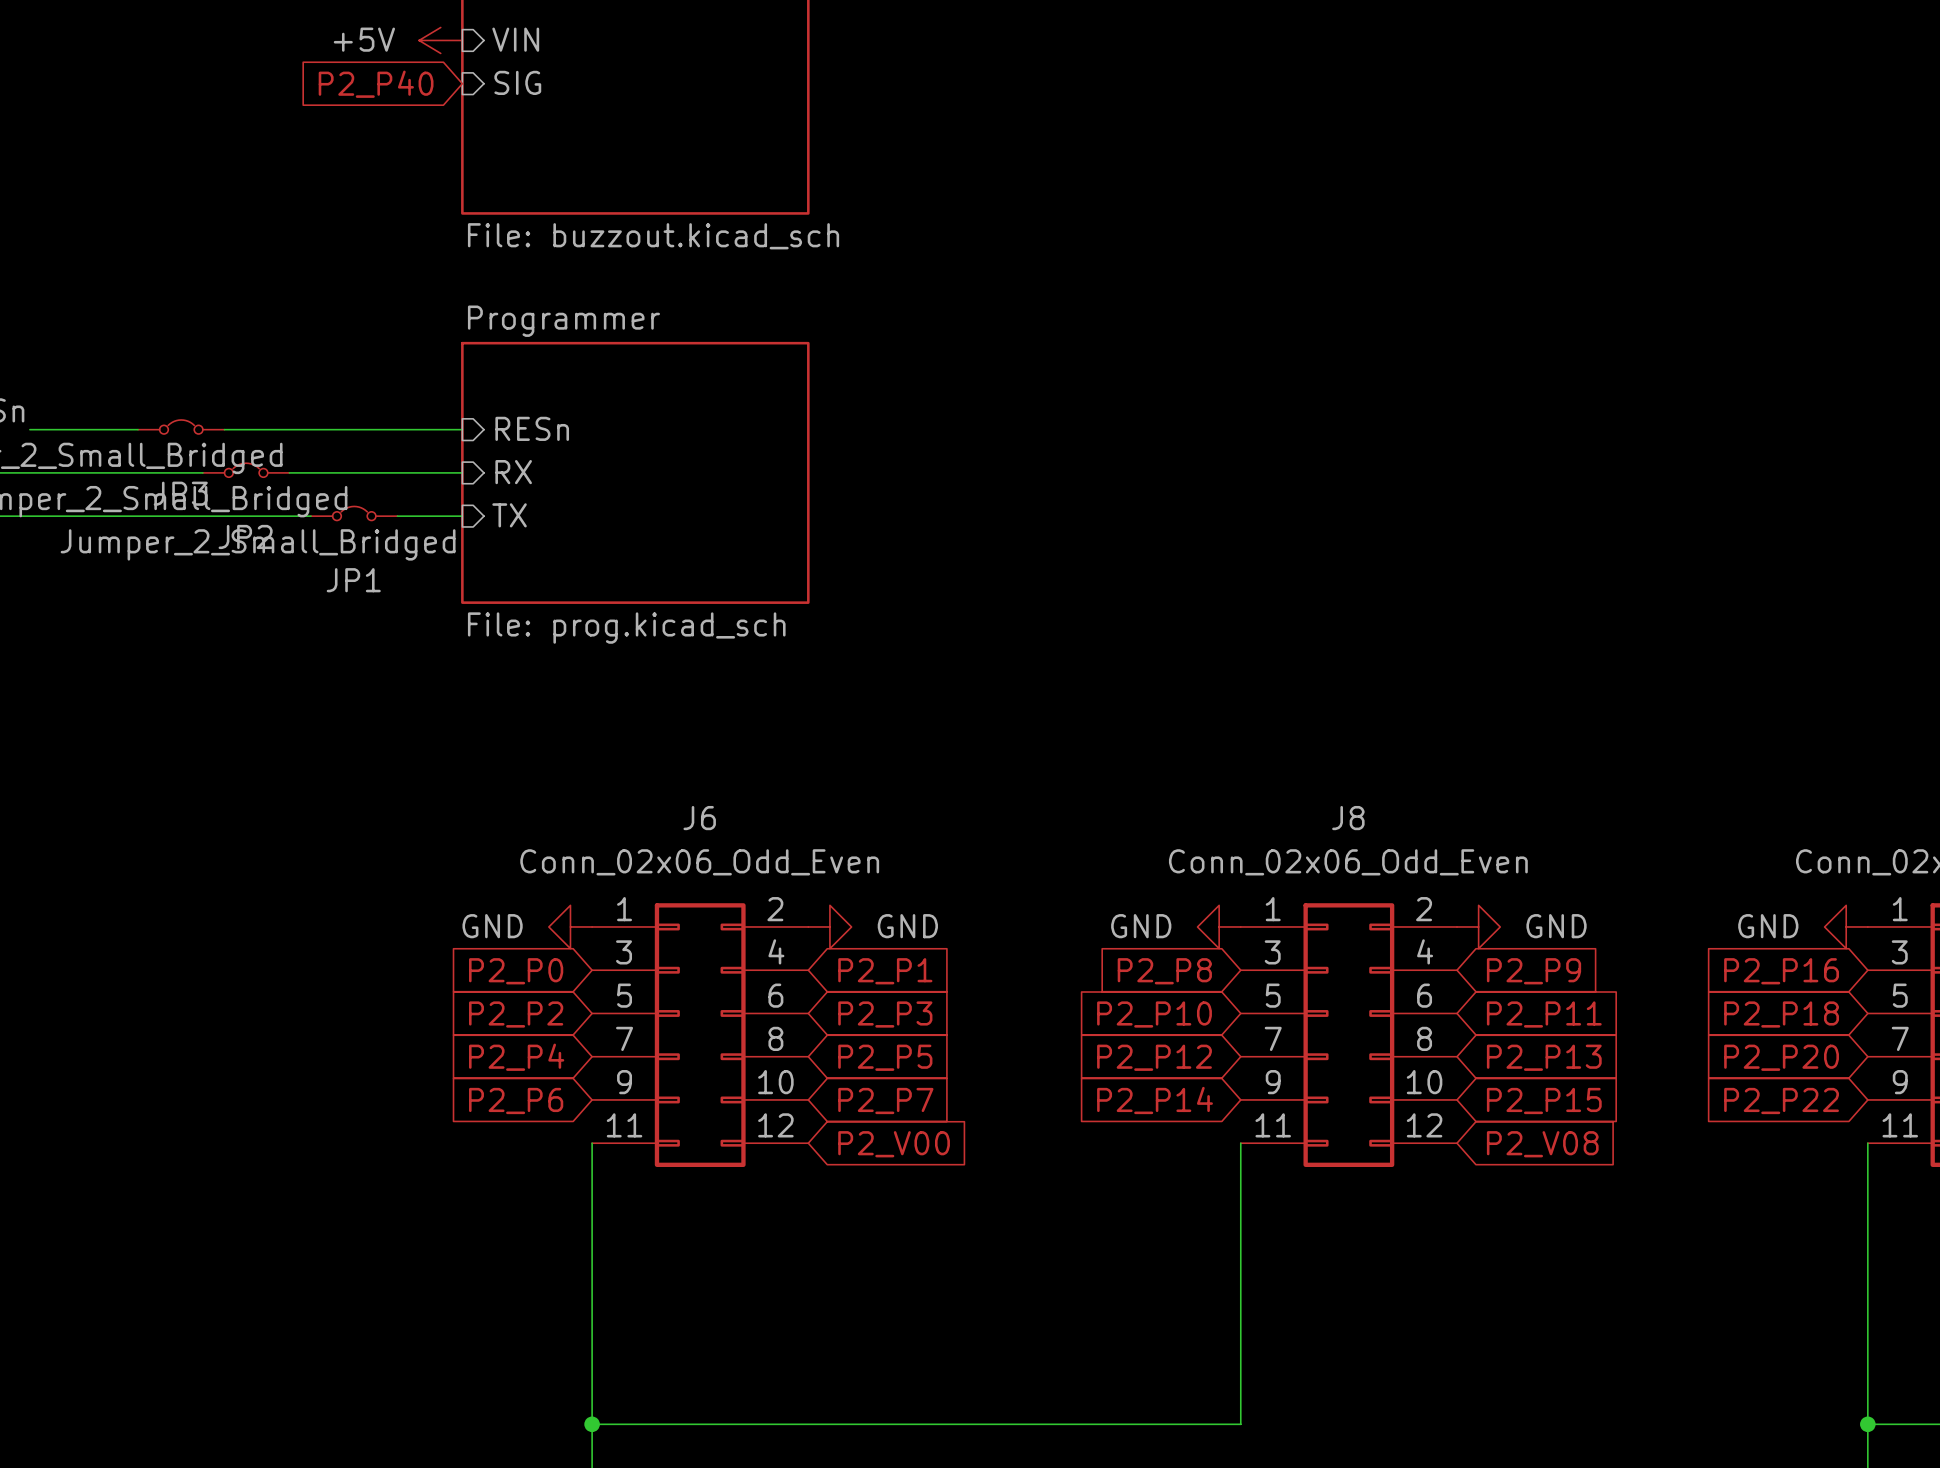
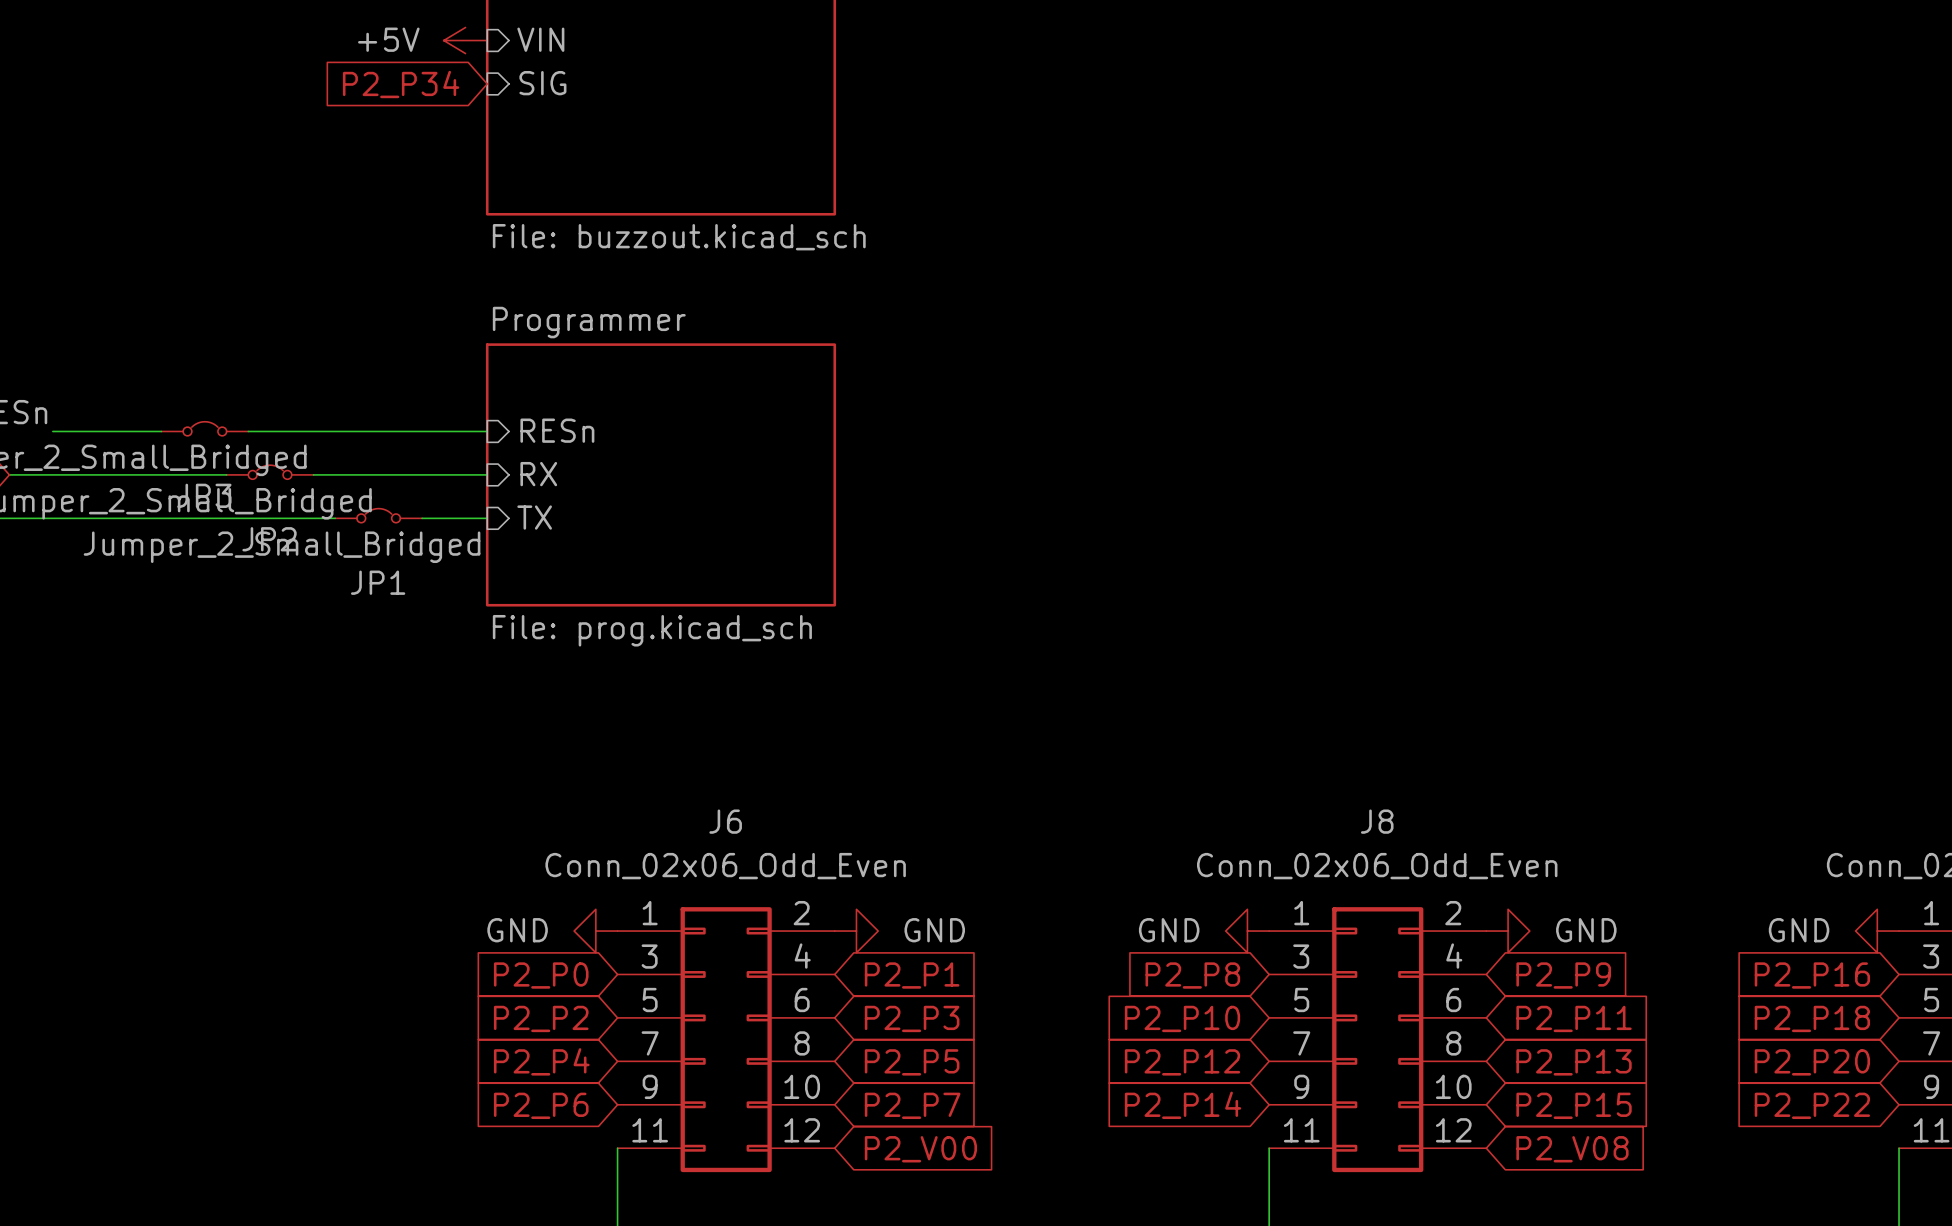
global label: P2_P40 (376, 84) -> P2_P34 (401, 84)

